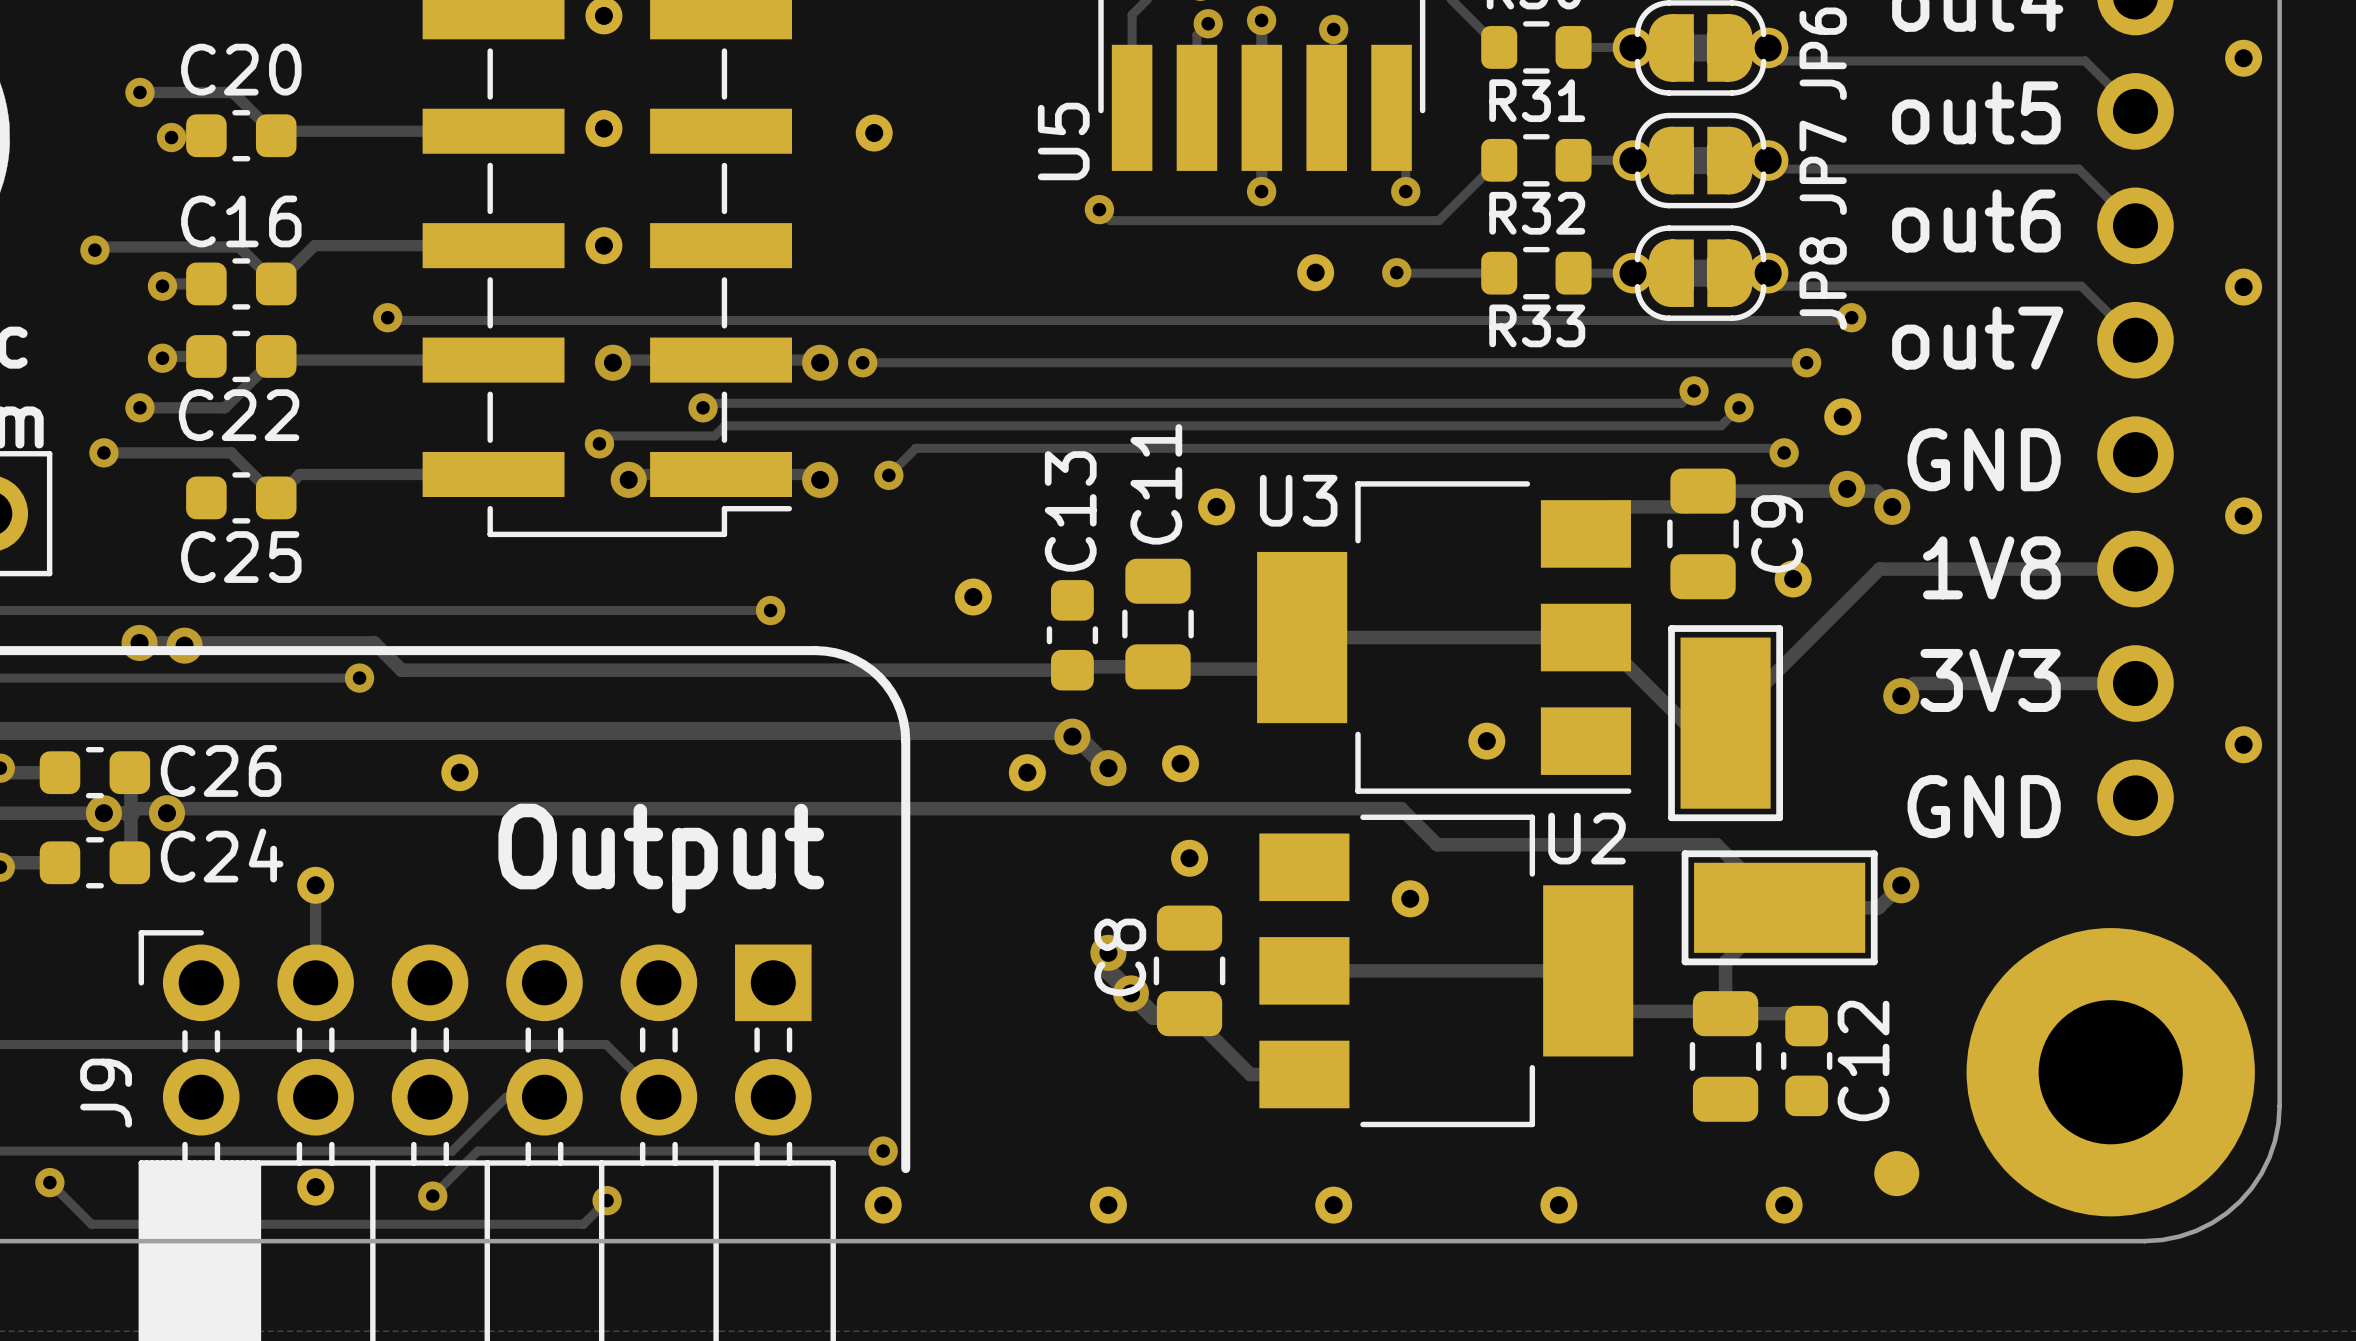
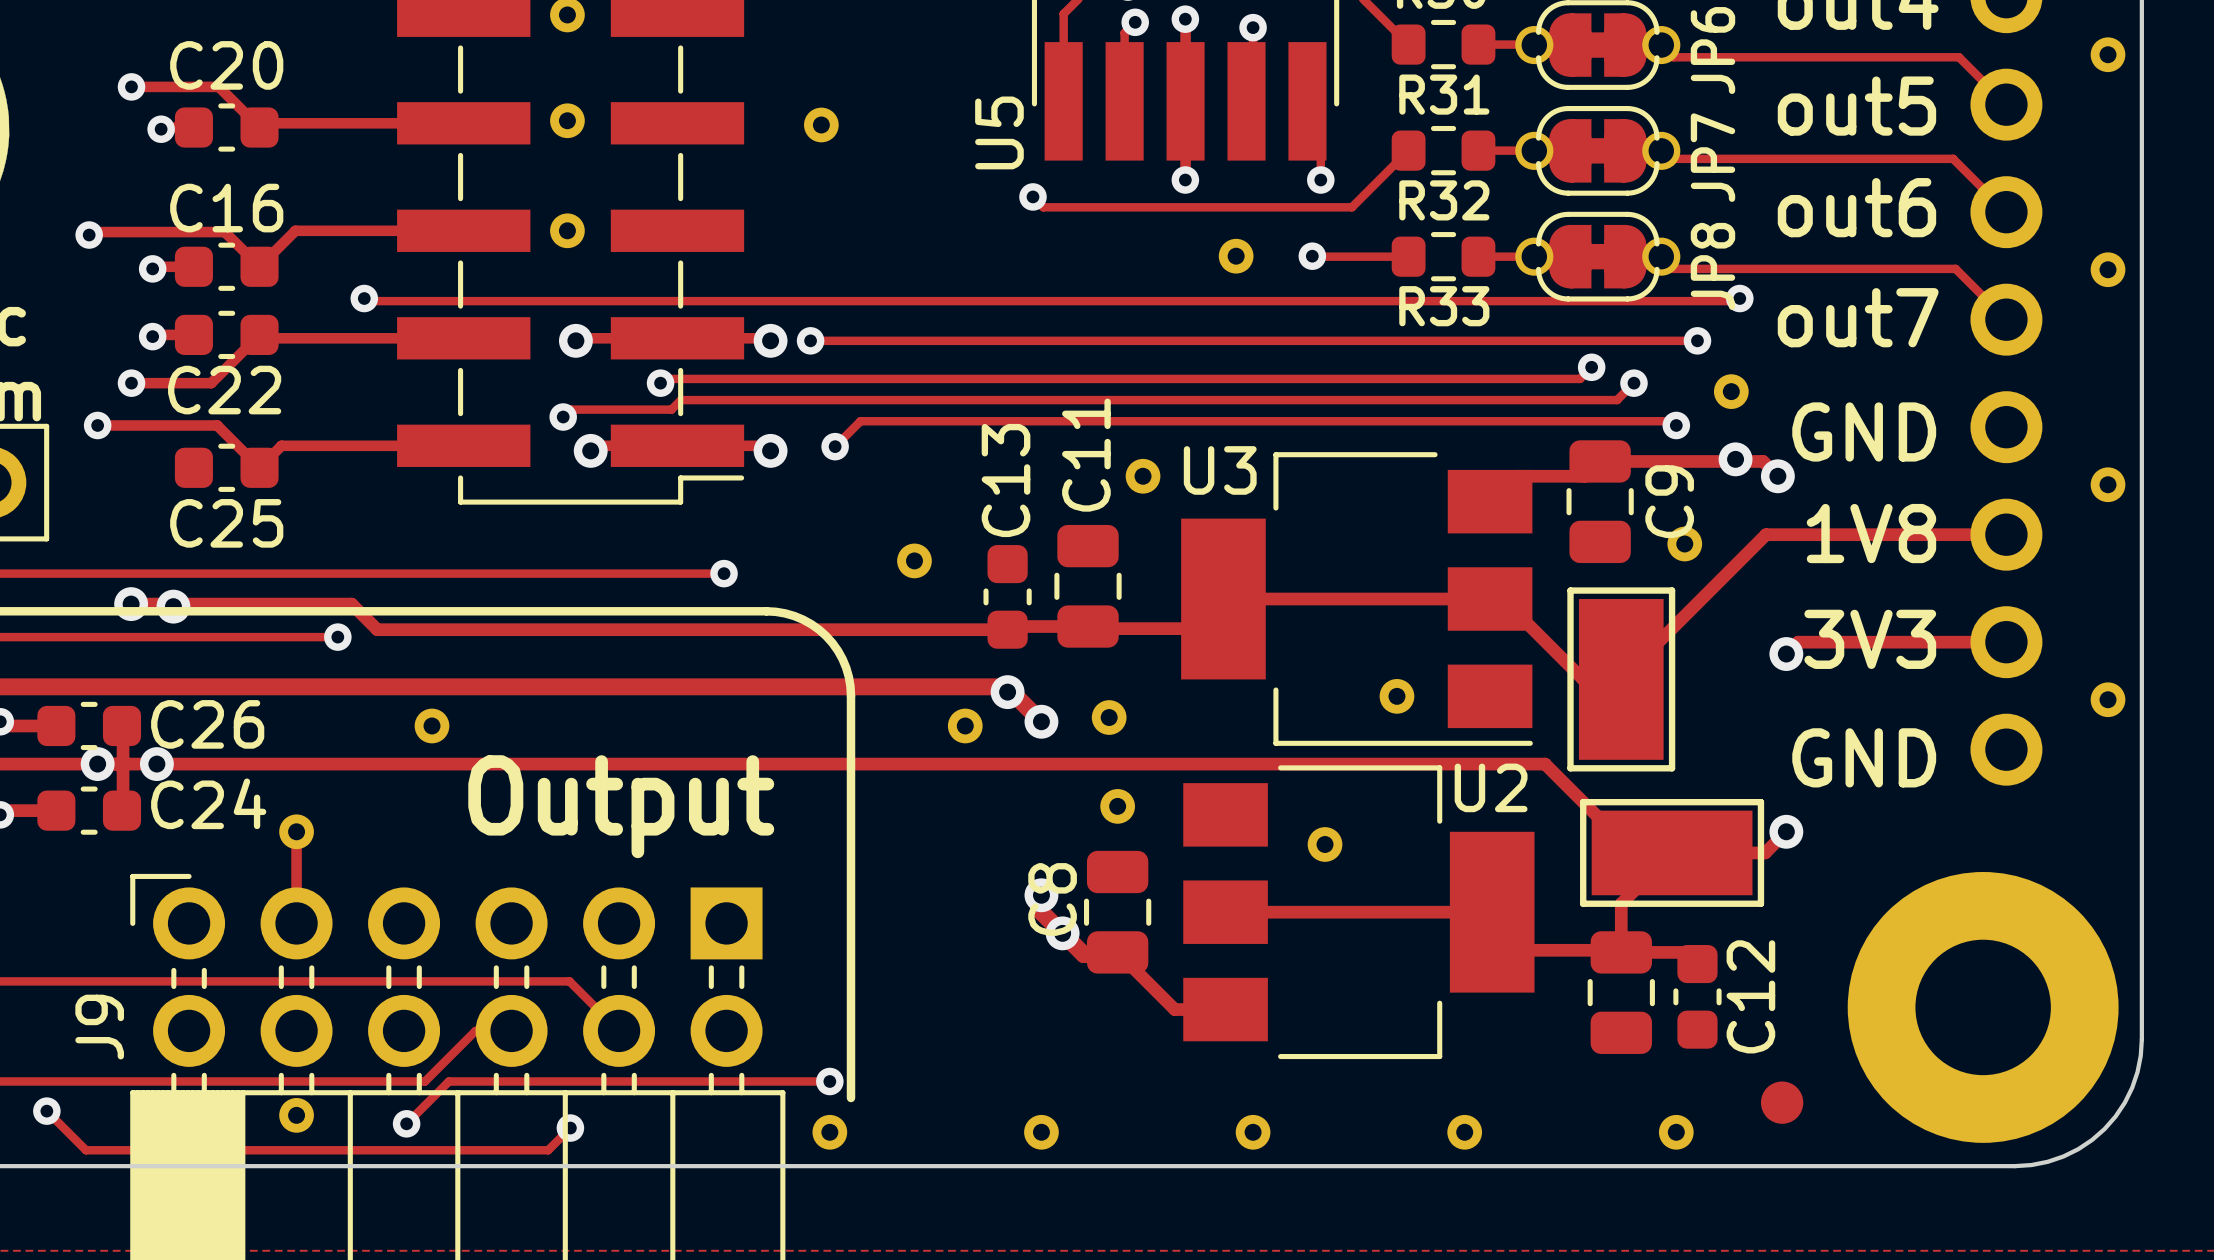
track: (130, 813) (135, 808) (1401, 808) (1437, 844) (1716, 844) (1779, 907) -> (123, 764) (1545, 764) (1633, 852)

